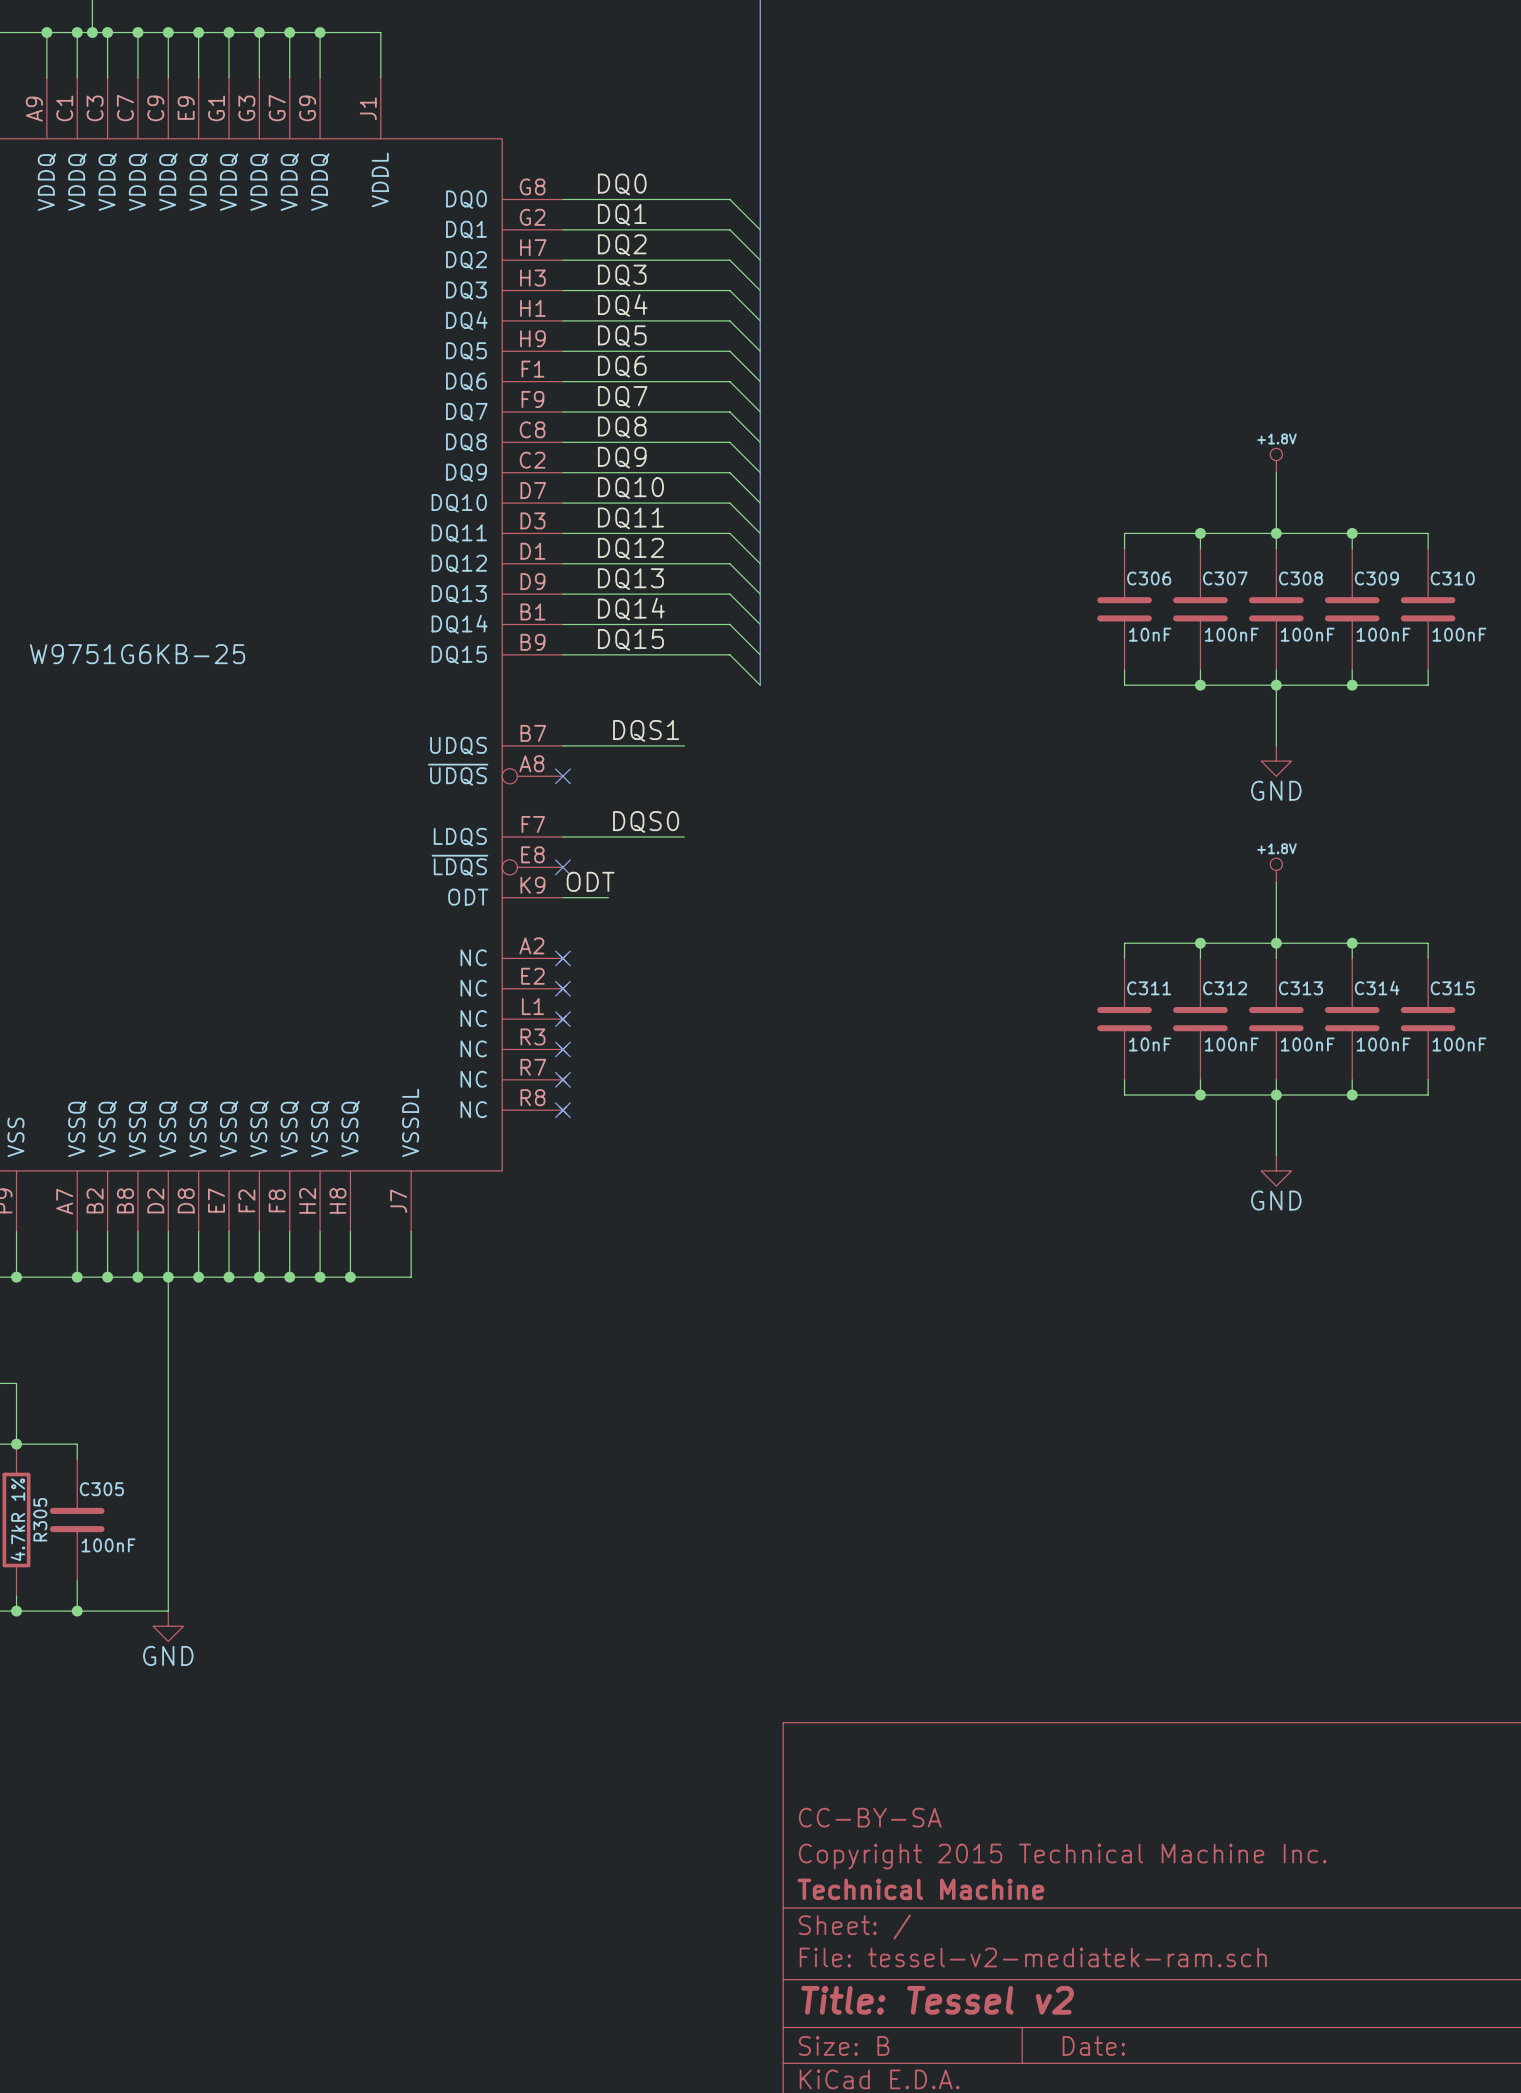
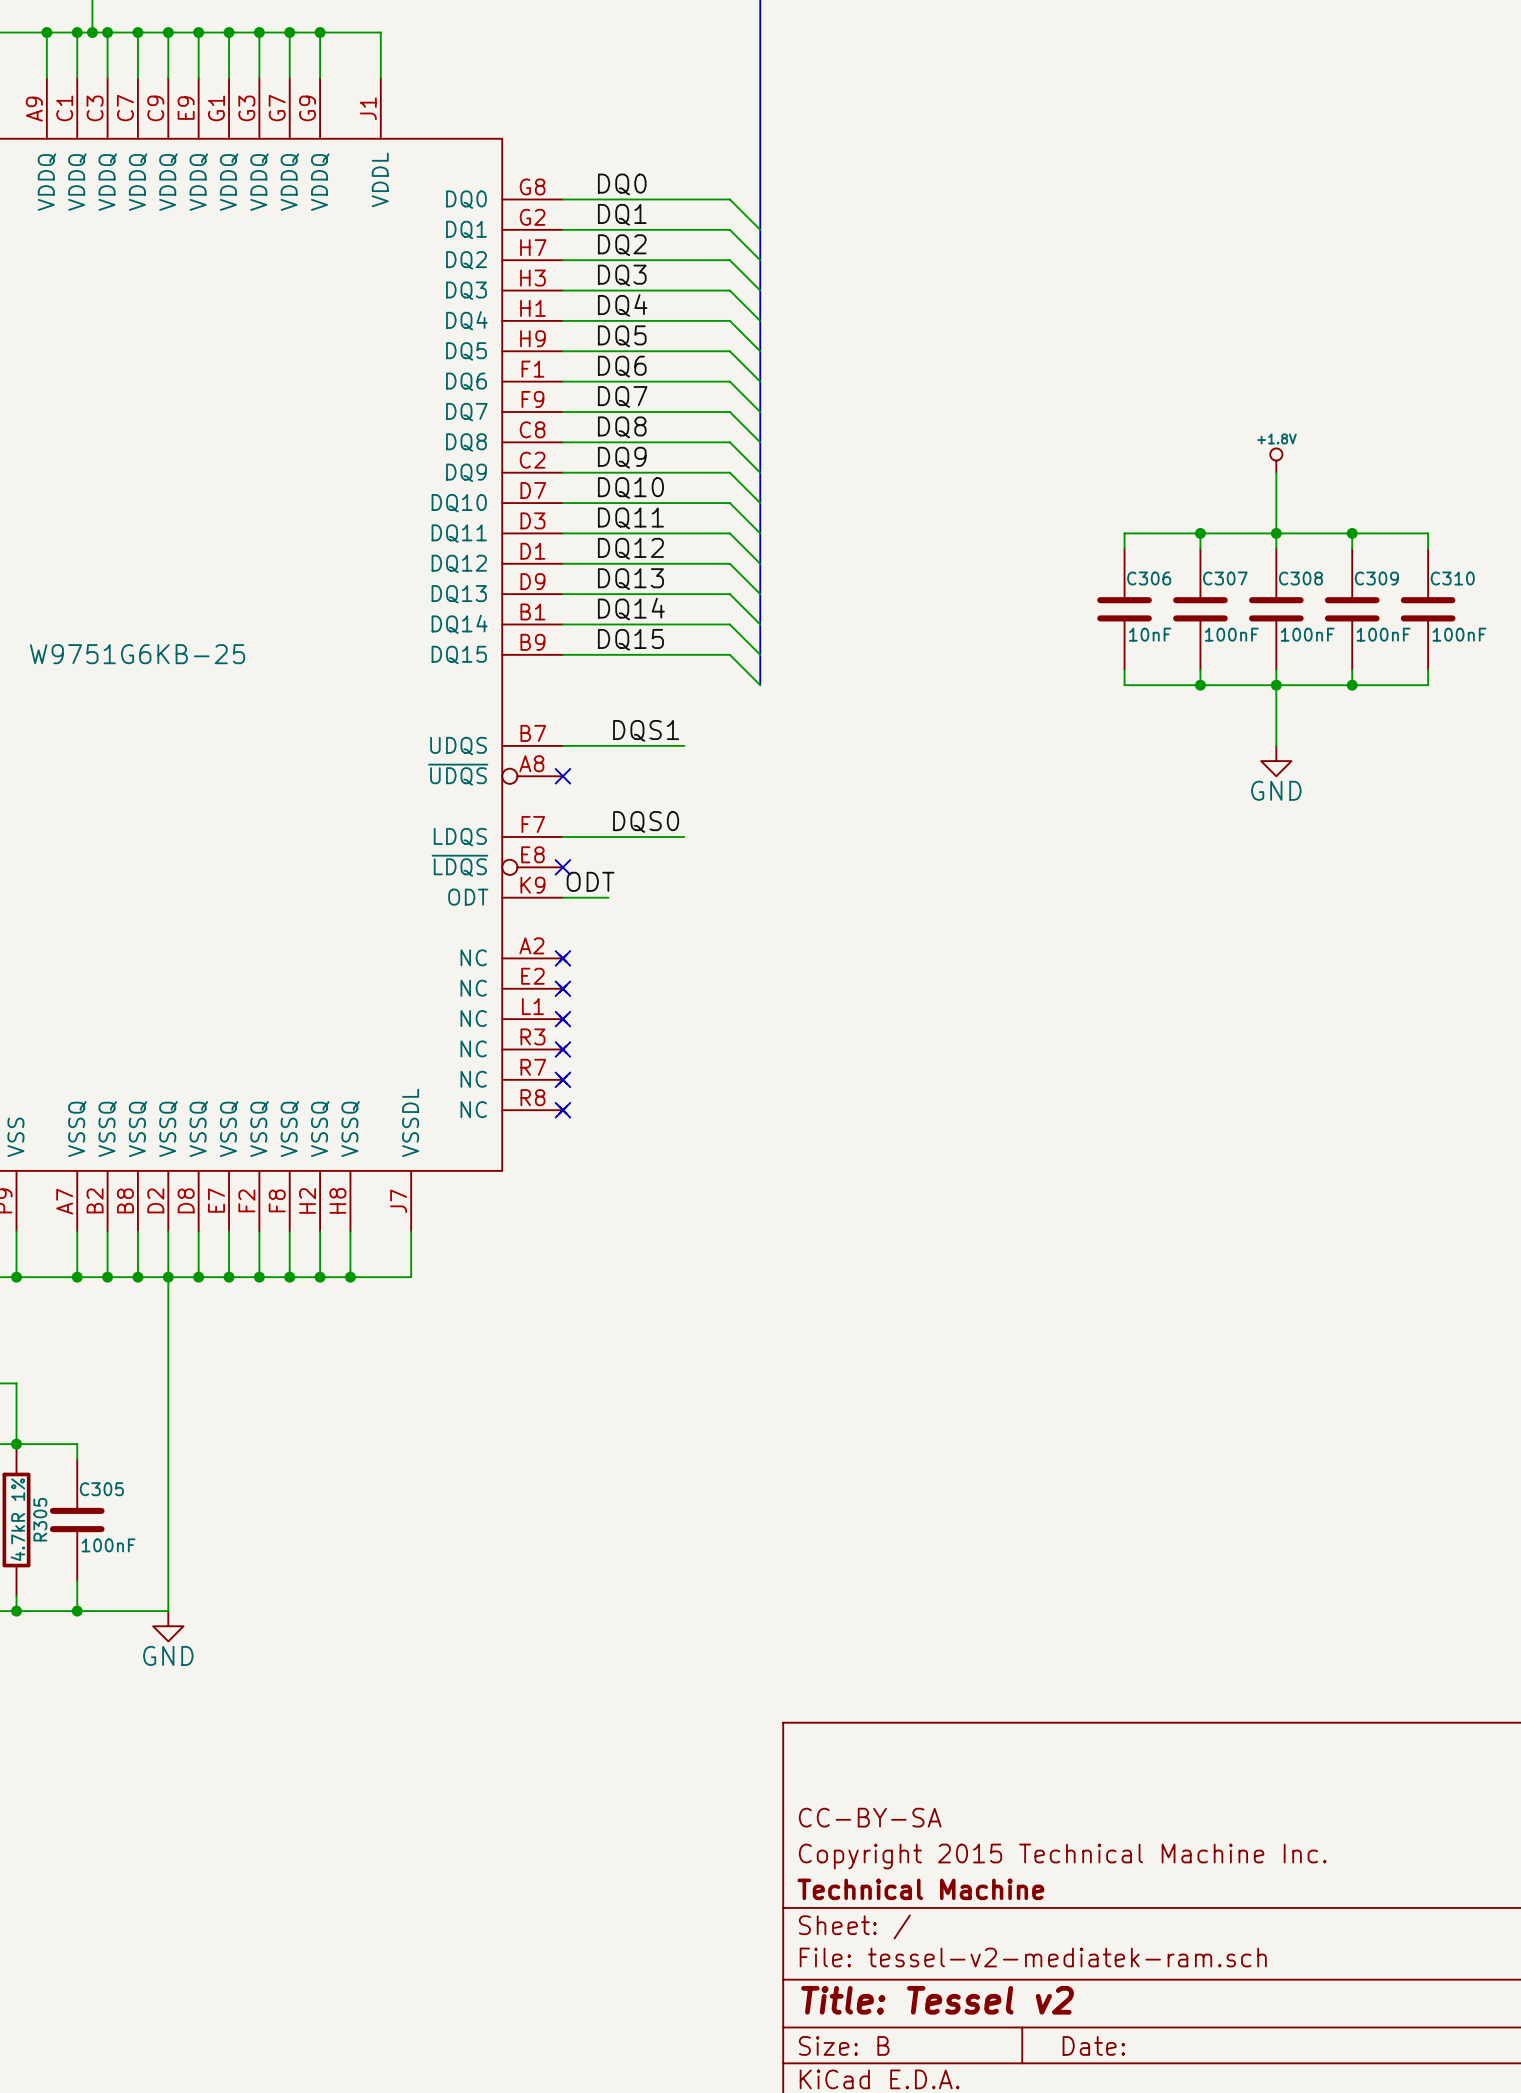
power symbol: +1.8V (1276, 870) -> none
wire: (1276, 882) (1276, 958) -> none
wire: (1200, 943) (1200, 958) -> none
junction: (1200, 943) -> none
junction: (1276, 943) -> none
wire: (1352, 943) (1352, 958) -> none
junction: (1352, 943) -> none
wire: (1124, 958) (1124, 943) (1428, 943) (1428, 958) -> none
C311: 10nF (1124, 1019) -> none
C312: 100nF (1200, 1019) -> none
C313: 100nF (1276, 1019) -> none
C314: 100nF (1352, 1019) -> none
C315: 100nF (1428, 1019) -> none
wire: (1124, 1079) (1124, 1095) (1428, 1095) (1428, 1079) -> none
wire: (1200, 1079) (1200, 1095) -> none
wire: (1276, 1079) (1276, 1155) -> none
wire: (1352, 1079) (1352, 1095) -> none
junction: (1200, 1095) -> none
junction: (1276, 1095) -> none
junction: (1352, 1095) -> none
power symbol: GND (1276, 1170) -> none

